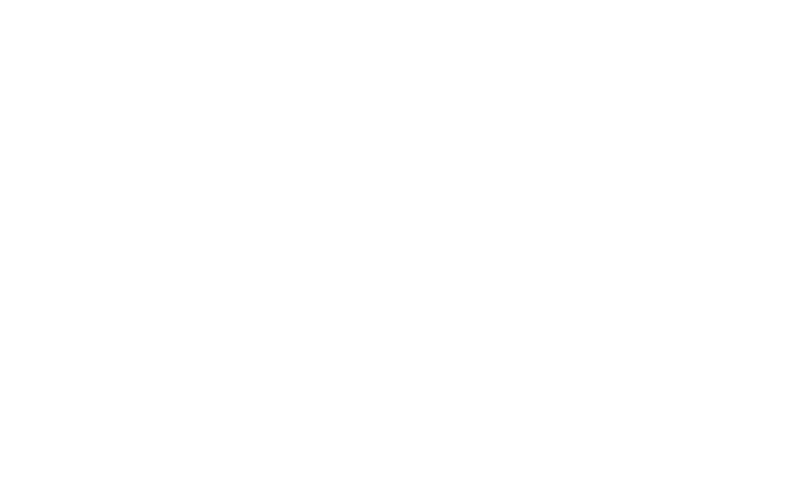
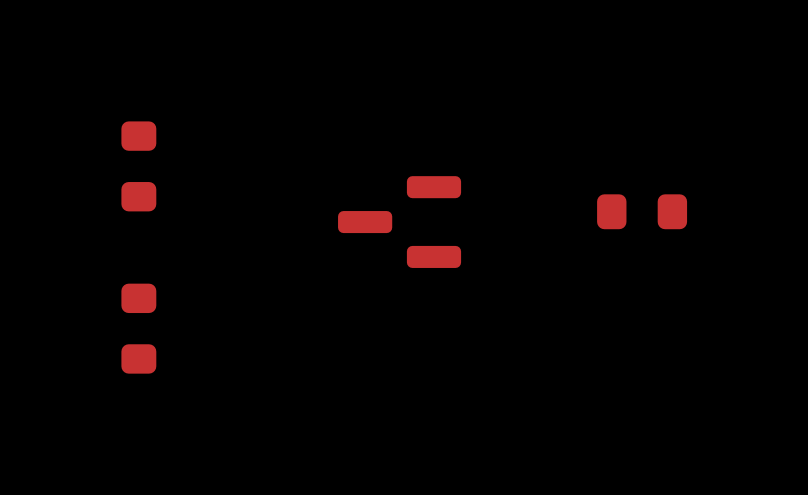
part: none -> (138, 166)
part: none -> (642, 211)
part: none -> (399, 222)
part: none -> (138, 328)

